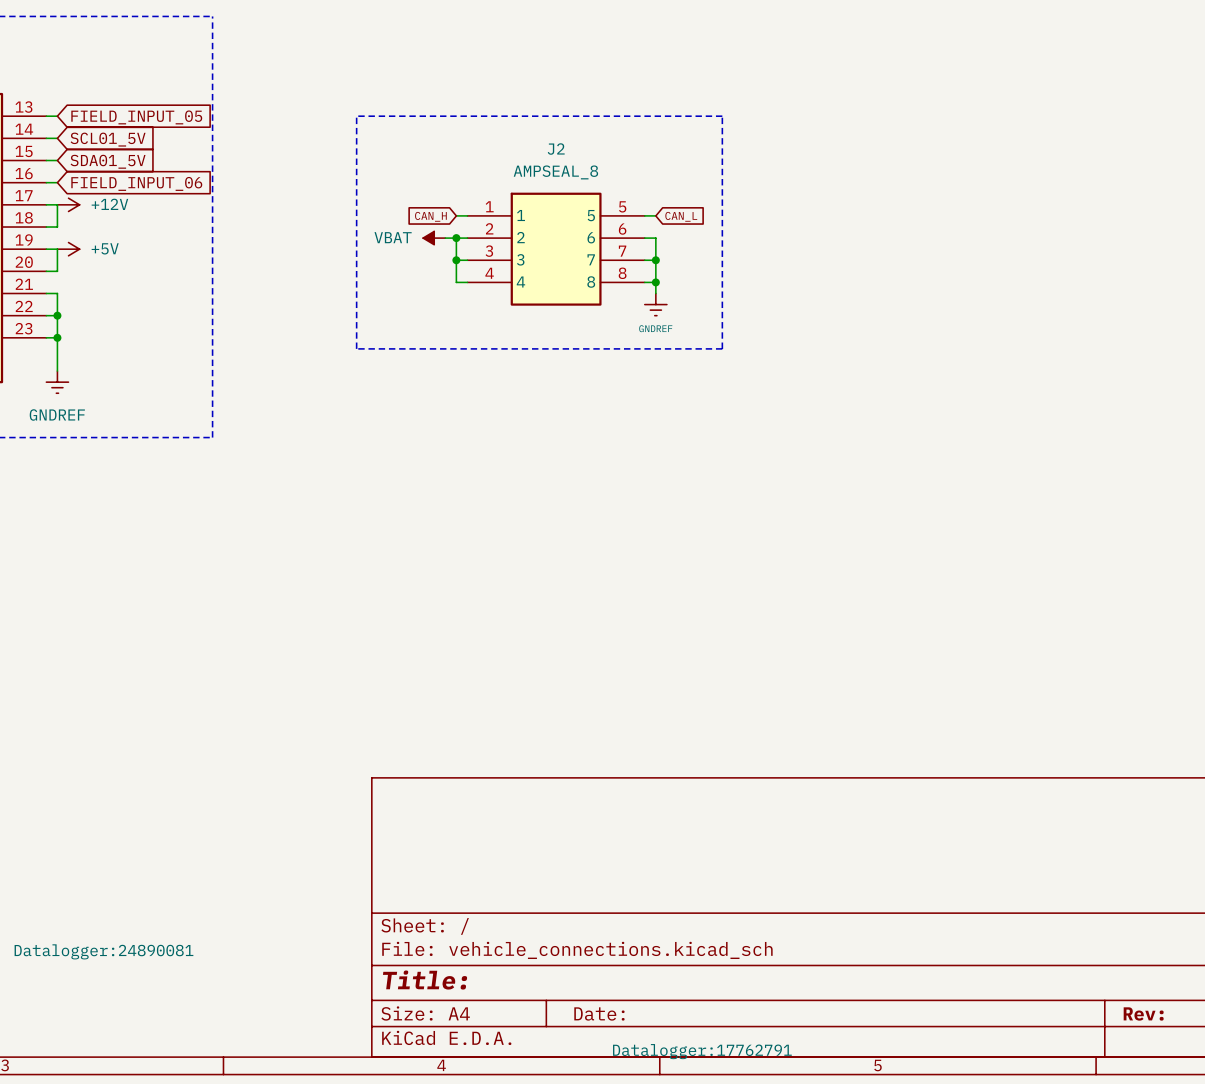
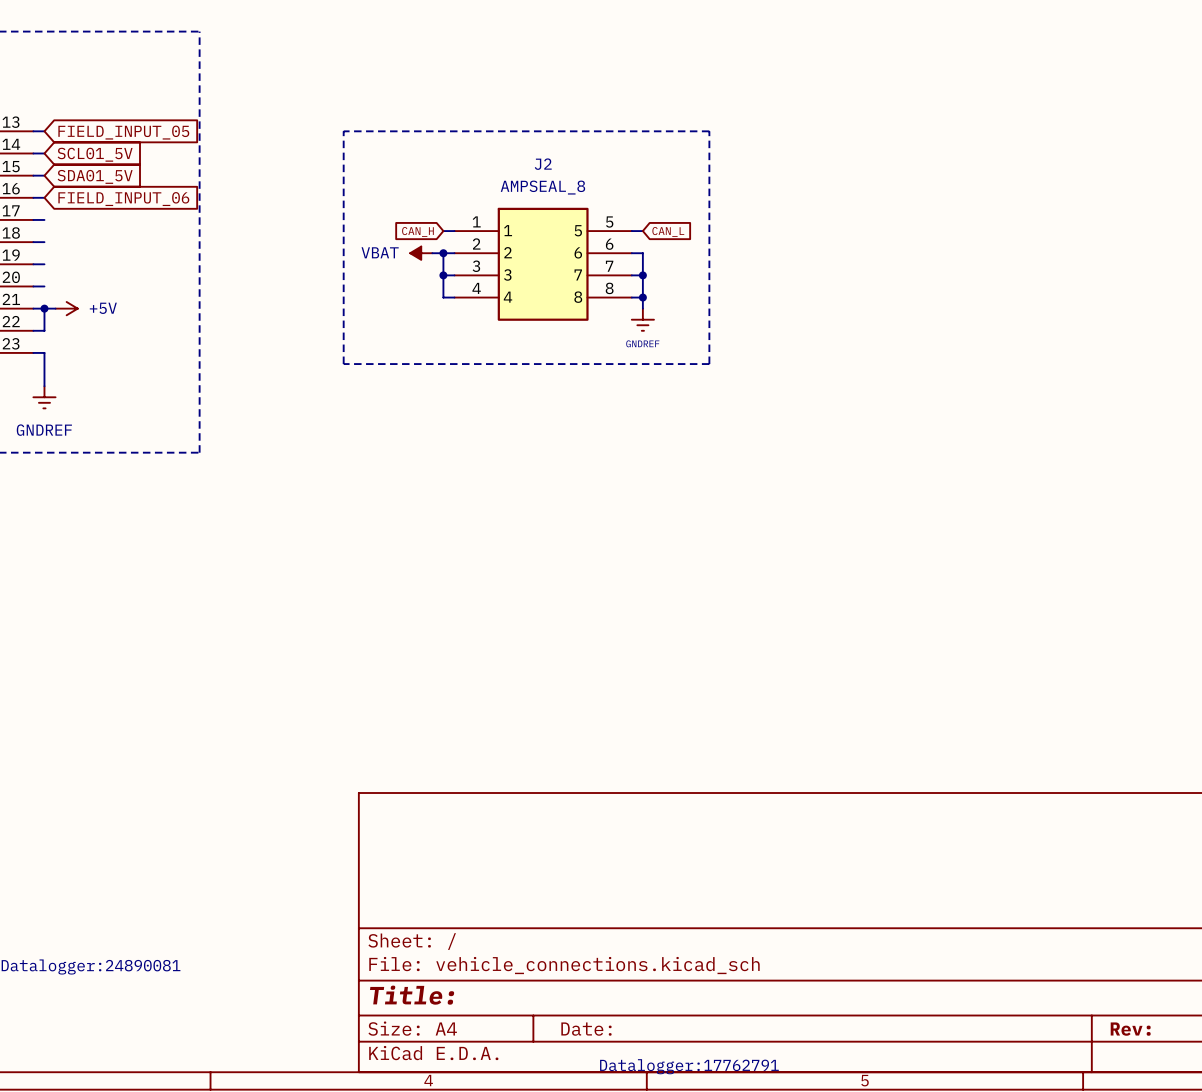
wire: (57, 204) (57, 227) -> none
power symbol: +12V (68, 204) -> none
wire: (57, 249) (57, 271) -> none
power symbol position: +5V (68, 249) -> +5V (66, 308)
wire: none -> (44, 308) (55, 308)
junction: none -> (44, 308)
wire: (57, 315) (57, 337) -> none
junction: (57, 315) -> none
junction: (57, 337) -> none

